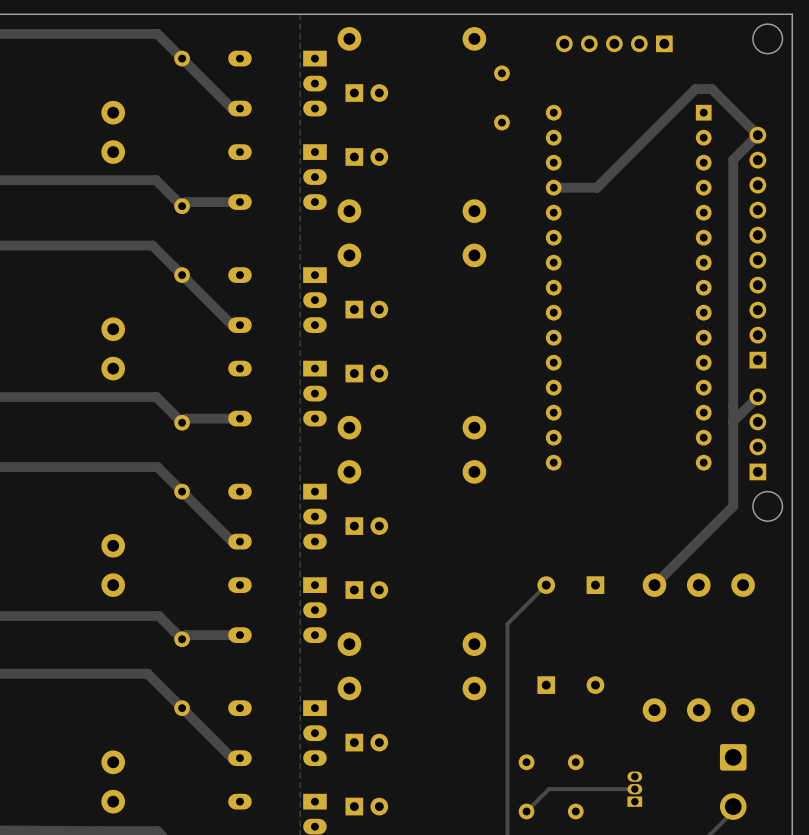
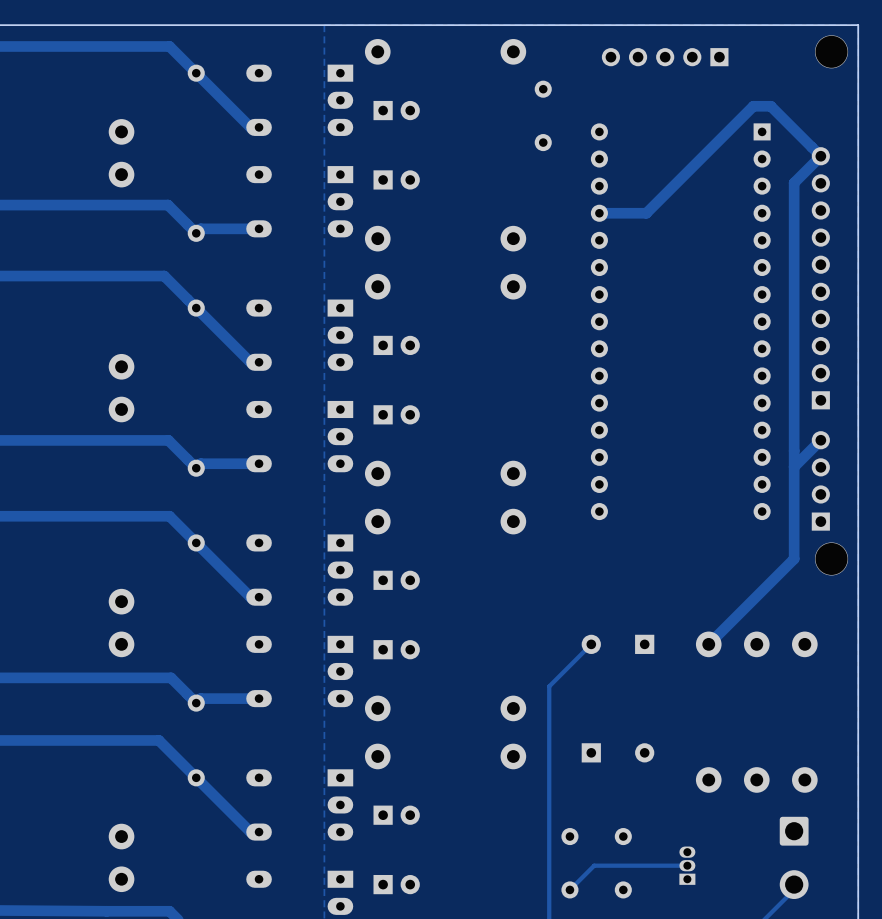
round board edge: [752, 23, 784, 55] -> none
via: none -> (831, 51)
round board edge: [752, 490, 784, 522] -> none
via: none -> (831, 558)

